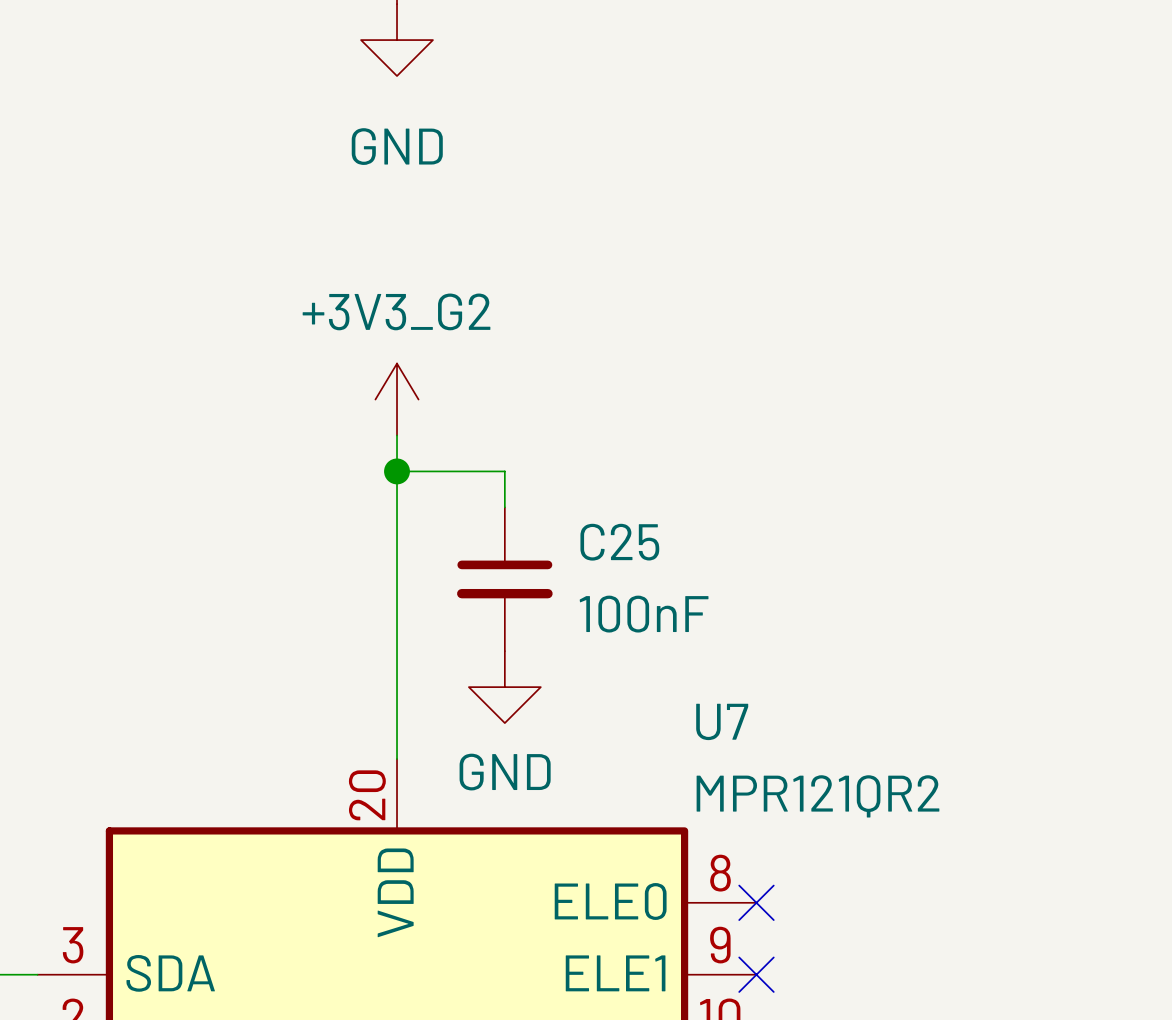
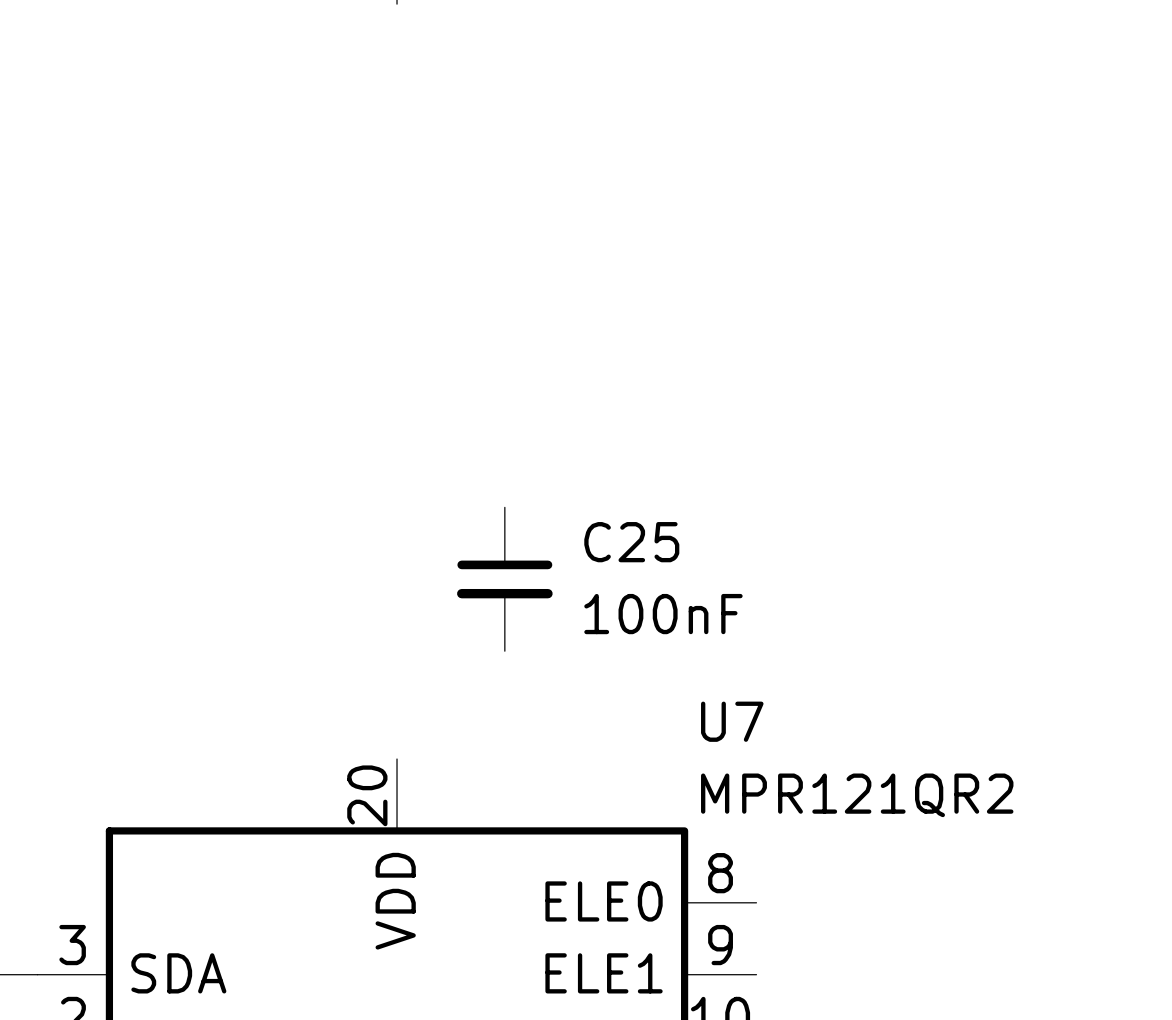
power symbol: GND (397, 40) -> none
power symbol: +3V3_G2 (397, 399) -> none
wire: (397, 435) (397, 759) -> none
wire: (397, 471) (504, 471) (504, 507) -> none
junction: (397, 471) -> none
power symbol: GND (504, 687) -> none
no-connect mark: (756, 902) -> none
no-connect mark: (756, 974) -> none

